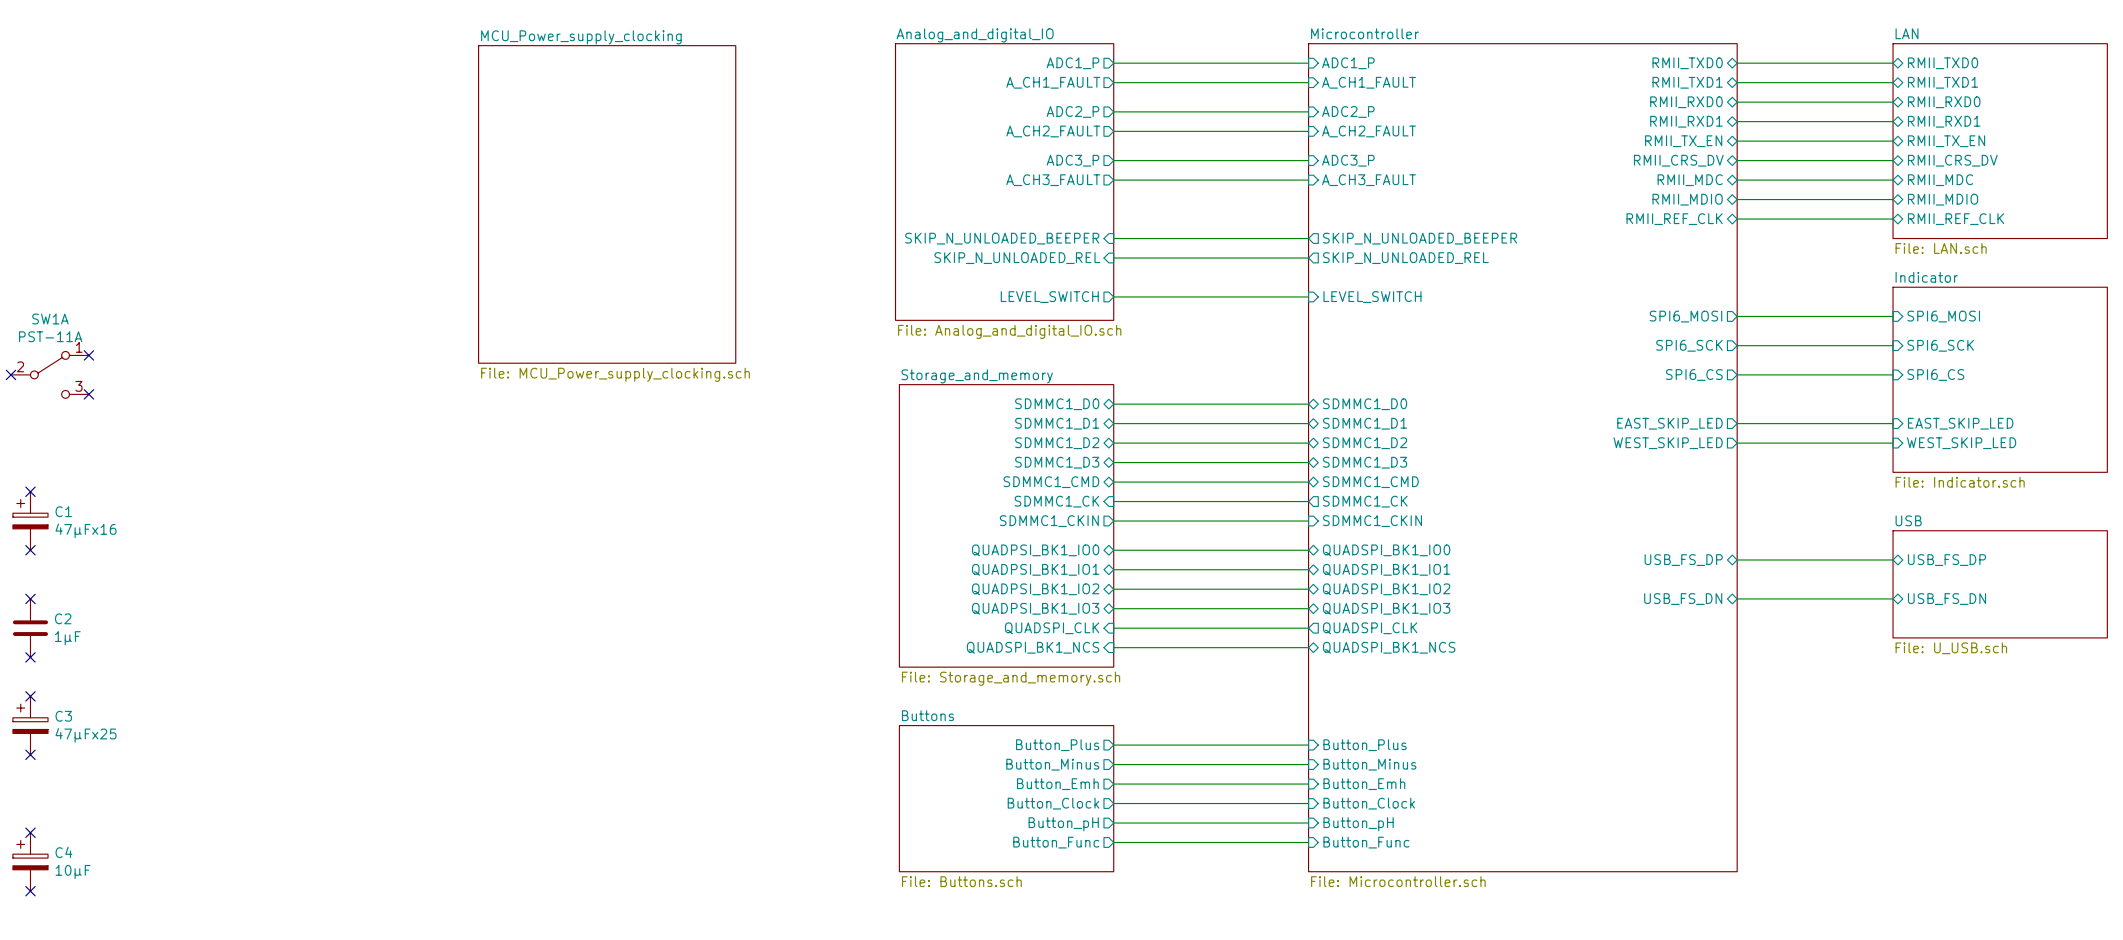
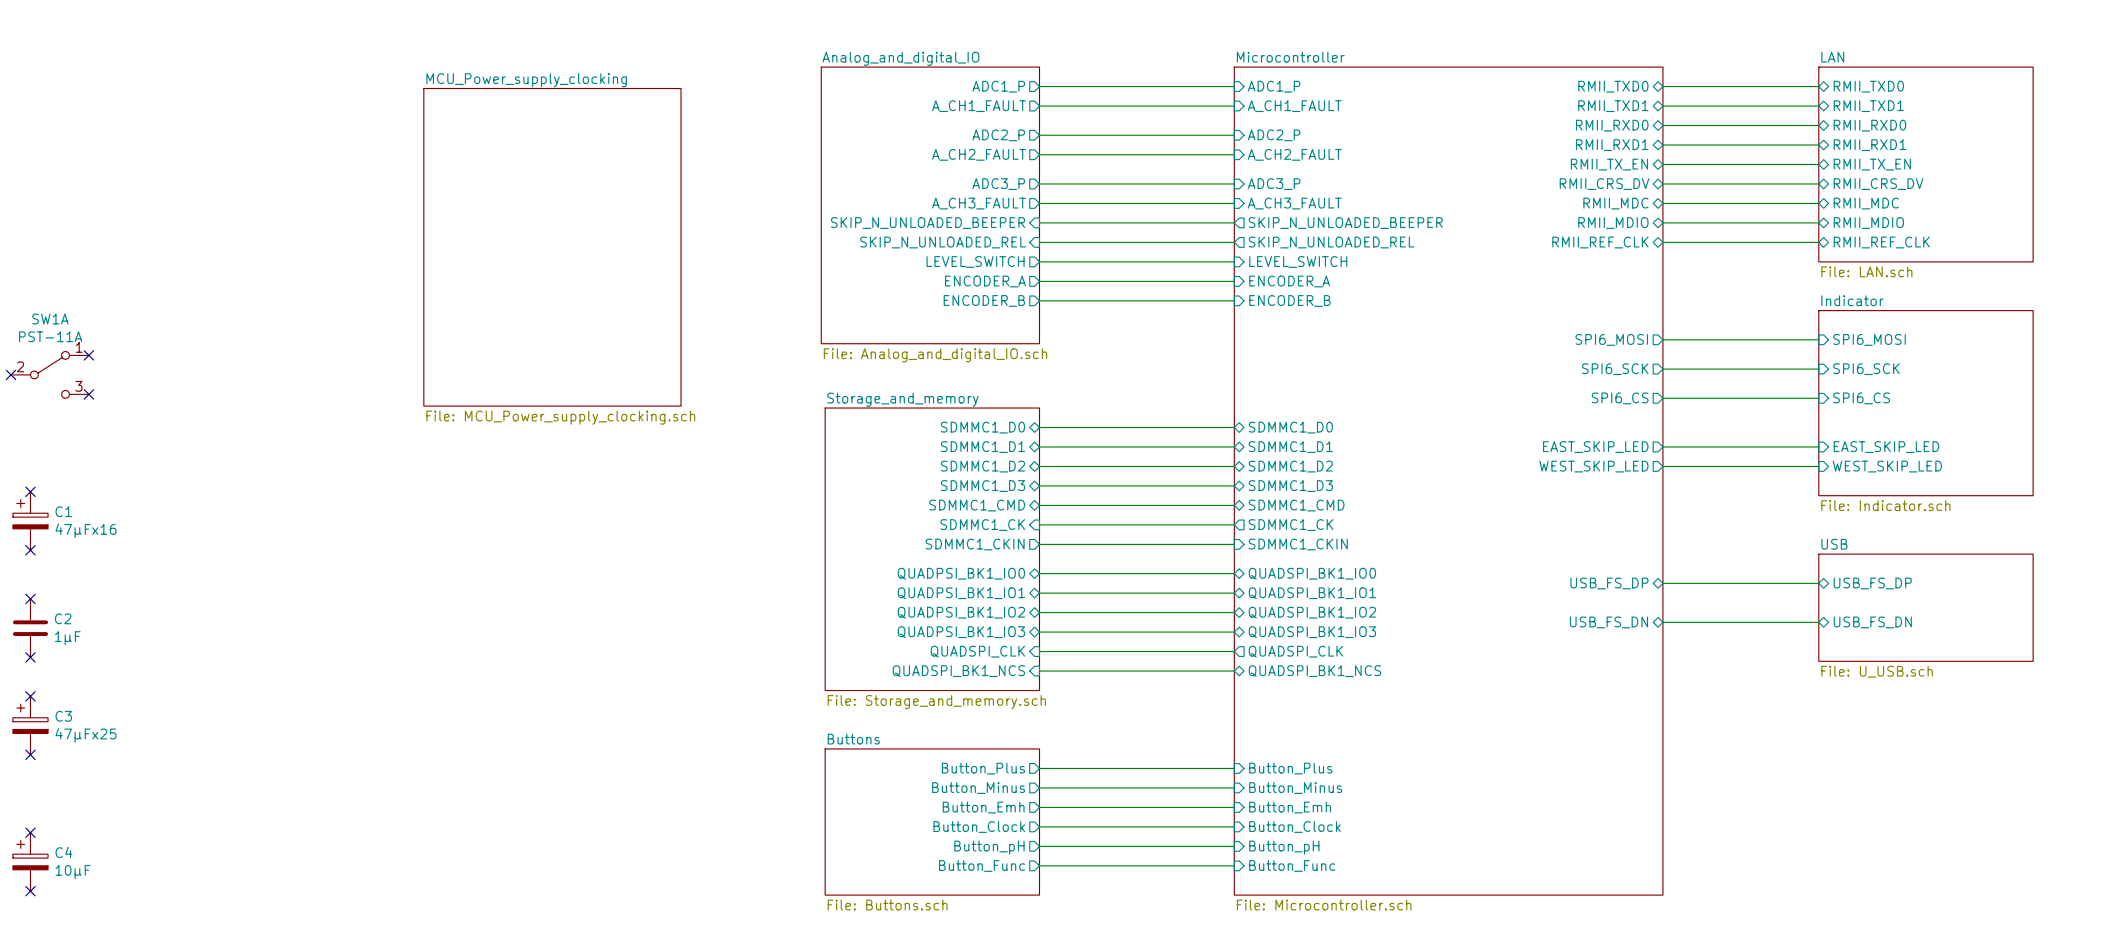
sheet pin: ADC1_P (1072, 63) -> none
wire: (1113, 63) (1308, 63) -> (1039, 86) (1234, 86)
sheet pin: ADC1_P (1348, 63) -> none
sheet pin: RMII_TXD0 (1687, 63) -> none
wire: (1737, 63) (1893, 63) -> (1662, 86) (1818, 86)
sheet pin: RMII_TXD0 (1943, 63) -> none
sheet pin: A_CH1_FAULT (1053, 82) -> none
wire: (1113, 82) (1308, 82) -> (1039, 106) (1234, 106)
sheet pin: A_CH1_FAULT (1369, 82) -> none
sheet pin: RMII_TXD1 (1687, 82) -> none
wire: (1737, 82) (1893, 82) -> (1662, 106) (1818, 106)
sheet pin: RMII_TXD1 (1943, 82) -> none
sheet pin: none -> ADC1_P (998, 86)
sheet pin: none -> ADC1_P (1274, 86)
sheet pin: none -> RMII_TXD0 (1613, 86)
sheet pin: none -> RMII_TXD0 (1868, 86)
sheet pin: RMII_RXD0 (1686, 102) -> none
wire: (1737, 102) (1893, 102) -> (1662, 125) (1818, 125)
sheet pin: RMII_RXD0 (1944, 102) -> none
sheet pin: none -> A_CH1_FAULT (979, 106)
sheet pin: none -> A_CH1_FAULT (1294, 106)
sheet pin: none -> RMII_TXD1 (1613, 106)
sheet pin: none -> RMII_TXD1 (1868, 106)
sheet pin: ADC2_P (1072, 111) -> none
wire: (1113, 111) (1308, 111) -> (1039, 135) (1234, 135)
sheet pin: ADC2_P (1348, 111) -> none
sheet pin: RMII_RXD1 (1686, 121) -> none
wire: (1737, 121) (1893, 121) -> (1662, 145) (1818, 145)
sheet pin: RMII_RXD1 (1944, 121) -> none
sheet pin: none -> RMII_RXD0 (1612, 125)
sheet pin: none -> RMII_RXD0 (1869, 125)
sheet pin: A_CH2_FAULT (1053, 131) -> none
wire: (1113, 131) (1308, 131) -> (1039, 154) (1234, 154)
sheet pin: A_CH2_FAULT (1369, 131) -> none
sheet pin: none -> ADC2_P (998, 135)
sheet pin: none -> ADC2_P (1274, 135)
sheet pin: RMII_TX_EN (1683, 141) -> none
wire: (1737, 141) (1893, 141) -> (1662, 164) (1818, 164)
sheet pin: RMII_TX_EN (1946, 141) -> none
sheet LAN position: (2000, 141) -> (1925, 164)
sheet pin: none -> RMII_RXD1 (1612, 145)
sheet pin: none -> RMII_RXD1 (1869, 145)
sheet pin: none -> A_CH2_FAULT (979, 154)
sheet pin: none -> A_CH2_FAULT (1294, 154)
sheet pin: ADC3_P (1072, 160) -> none
wire: (1113, 160) (1308, 160) -> (1039, 183) (1234, 183)
sheet pin: ADC3_P (1348, 160) -> none
sheet pin: RMII_CRS_DV (1678, 160) -> none
wire: (1737, 160) (1893, 160) -> (1662, 183) (1818, 183)
sheet pin: RMII_CRS_DV (1952, 160) -> none
sheet pin: none -> RMII_TX_EN (1609, 164)
sheet pin: none -> RMII_TX_EN (1872, 164)
sheet pin: A_CH3_FAULT (1053, 180) -> none
wire: (1113, 180) (1308, 180) -> (1039, 203) (1234, 203)
sheet pin: A_CH3_FAULT (1369, 180) -> none
sheet pin: RMII_MDC (1690, 180) -> RMII_CRS_DV (1604, 184)
wire: (1737, 180) (1893, 180) -> (1662, 203) (1818, 203)
sheet pin: RMII_MDC (1940, 180) -> RMII_CRS_DV (1878, 184)
sheet Analog_and_digital_IO position: (1004, 182) -> (930, 205)
sheet pin: none -> ADC3_P (998, 184)
sheet pin: none -> ADC3_P (1274, 184)
sheet pin: RMII_MDIO (1687, 199) -> RMII_MDC (1615, 203)
wire: (1737, 199) (1893, 199) -> (1662, 222) (1818, 222)
sheet pin: RMII_MDIO (1943, 199) -> RMII_MDC (1866, 203)
sheet pin: none -> A_CH3_FAULT (979, 203)
sheet pin: none -> A_CH3_FAULT (1294, 203)
sheet MCU_Power_supply_clocking position: (607, 204) -> (552, 247)
sheet pin: RMII_REF_CLK (1674, 219) -> none
wire: (1737, 219) (1893, 219) -> (1662, 242) (1818, 242)
sheet pin: RMII_REF_CLK (1956, 219) -> none
wire: none -> (1039, 222) (1234, 222)
sheet pin: none -> SKIP_N_UNLOADED_BEEPER (928, 223)
sheet pin: none -> SKIP_N_UNLOADED_BEEPER (1345, 223)
sheet pin: none -> RMII_MDIO (1613, 223)
sheet pin: none -> RMII_MDIO (1868, 223)
sheet pin: SKIP_N_UNLOADED_BEEPER (1002, 238) -> none
wire: (1113, 238) (1308, 238) -> (1039, 261) (1234, 261)
sheet pin: SKIP_N_UNLOADED_BEEPER (1420, 238) -> none
sheet pin: none -> SKIP_N_UNLOADED_REL (943, 242)
wire: none -> (1039, 242) (1234, 242)
sheet pin: none -> SKIP_N_UNLOADED_REL (1331, 242)
sheet pin: none -> RMII_REF_CLK (1600, 242)
sheet pin: none -> RMII_REF_CLK (1881, 242)
sheet pin: SKIP_N_UNLOADED_REL (1017, 258) -> none
wire: (1113, 258) (1308, 258) -> (1039, 281) (1234, 281)
sheet pin: SKIP_N_UNLOADED_REL (1405, 258) -> none
sheet pin: none -> LEVEL_SWITCH (975, 262)
sheet pin: none -> LEVEL_SWITCH (1298, 262)
sheet pin: none -> ENCODER_A (985, 281)
sheet pin: none -> ENCODER_A (1289, 281)
wire: (1113, 296) (1308, 296) -> (1039, 300) (1234, 300)
sheet pin: LEVEL_SWITCH (1049, 297) -> none
sheet pin: LEVEL_SWITCH (1372, 297) -> none
sheet pin: none -> ENCODER_B (984, 300)
sheet pin: none -> ENCODER_B (1289, 300)
sheet pin: SPI6_MOSI (1685, 316) -> none
wire: (1737, 316) (1893, 316) -> (1662, 339) (1818, 339)
sheet pin: SPI6_MOSI (1943, 316) -> none
sheet pin: SPI6_SCK (1689, 345) -> SPI6_MOSI (1611, 339)
wire: (1737, 345) (1893, 345) -> (1662, 369) (1818, 369)
sheet pin: SPI6_SCK (1940, 345) -> SPI6_MOSI (1869, 339)
sheet pin: none -> SPI6_SCK (1615, 369)
wire: (1737, 374) (1893, 374) -> (1662, 398) (1818, 398)
sheet pin: SPI6_CS (1694, 375) -> none
sheet pin: SPI6_CS (1935, 375) -> SPI6_SCK (1866, 369)
sheet Indicator position: (2000, 379) -> (1925, 403)
sheet pin: none -> SPI6_CS (1620, 398)
sheet pin: none -> SPI6_CS (1861, 398)
sheet pin: SDMMC1_D0 (1057, 404) -> none
wire: (1113, 404) (1308, 404) -> (1039, 427) (1234, 427)
sheet pin: SDMMC1_D0 (1365, 404) -> none
sheet pin: SDMMC1_D1 (1057, 423) -> none
wire: (1113, 423) (1308, 423) -> (1039, 446) (1234, 446)
sheet pin: SDMMC1_D1 (1365, 423) -> none
sheet pin: EAST_SKIP_LED (1669, 423) -> none
wire: (1737, 423) (1893, 423) -> (1662, 446) (1818, 446)
sheet pin: EAST_SKIP_LED (1960, 423) -> none
sheet pin: none -> SDMMC1_D0 (982, 427)
sheet pin: none -> SDMMC1_D0 (1290, 427)
sheet pin: SDMMC1_D2 (1057, 443) -> none
wire: (1113, 443) (1308, 443) -> (1039, 466) (1234, 466)
sheet pin: SDMMC1_D2 (1365, 443) -> none
sheet pin: WEST_SKIP_LED (1668, 443) -> EAST_SKIP_LED (1595, 447)
wire: (1737, 443) (1893, 443) -> (1662, 466) (1818, 466)
sheet pin: WEST_SKIP_LED (1961, 443) -> EAST_SKIP_LED (1886, 447)
sheet pin: none -> SDMMC1_D1 (982, 447)
sheet pin: none -> SDMMC1_D1 (1290, 447)
sheet Microcontroller position: (1522, 457) -> (1448, 481)
sheet pin: SDMMC1_D3 (1057, 462) -> none
wire: (1113, 462) (1308, 462) -> (1039, 485) (1234, 485)
sheet pin: SDMMC1_D3 (1365, 462) -> none
sheet pin: none -> SDMMC1_D2 (982, 466)
sheet pin: none -> SDMMC1_D2 (1290, 466)
sheet pin: none -> WEST_SKIP_LED (1593, 466)
sheet pin: none -> WEST_SKIP_LED (1887, 466)
sheet pin: SDMMC1_CMD (1051, 482) -> none
wire: (1113, 482) (1308, 482) -> (1039, 505) (1234, 505)
sheet pin: SDMMC1_CMD (1370, 482) -> none
sheet pin: none -> SDMMC1_D3 (982, 486)
sheet pin: none -> SDMMC1_D3 (1290, 486)
sheet pin: SDMMC1_CK (1056, 501) -> none
wire: (1113, 501) (1308, 501) -> (1039, 524) (1234, 524)
sheet pin: SDMMC1_CK (1365, 501) -> none
sheet pin: none -> SDMMC1_CMD (977, 505)
sheet pin: none -> SDMMC1_CMD (1296, 505)
sheet pin: SDMMC1_CKIN (1049, 521) -> none
wire: (1113, 521) (1308, 521) -> (1039, 544) (1234, 544)
sheet pin: SDMMC1_CKIN (1372, 521) -> none
sheet pin: none -> SDMMC1_CK (982, 525)
sheet Storage_and_memory position: (1006, 525) -> (932, 549)
sheet pin: none -> SDMMC1_CK (1291, 525)
sheet pin: none -> SDMMC1_CKIN (975, 544)
sheet pin: none -> SDMMC1_CKIN (1298, 544)
sheet pin position: QUADPSI_BK1_IO0 (1035, 550) -> QUADPSI_BK1_IO0 (961, 573)
wire: (1113, 550) (1308, 550) -> (1039, 573) (1234, 573)
sheet pin position: QUADSPI_BK1_IO0 (1386, 550) -> QUADSPI_BK1_IO0 (1312, 573)
wire: (1737, 559) (1893, 559) -> (1662, 583) (1818, 583)
sheet pin: USB_FS_DP (1683, 560) -> none
sheet pin: USB_FS_DP (1946, 560) -> none
sheet pin position: QUADPSI_BK1_IO1 (1035, 569) -> QUADPSI_BK1_IO1 (961, 593)
wire: (1113, 569) (1308, 569) -> (1039, 593) (1234, 593)
sheet pin position: QUADSPI_BK1_IO1 (1386, 569) -> QUADSPI_BK1_IO1 (1312, 593)
sheet USB position: (2000, 584) -> (1925, 607)
sheet pin position: QUADPSI_BK1_IO2 (1035, 589) -> QUADPSI_BK1_IO2 (961, 612)
wire: (1113, 589) (1308, 589) -> (1039, 612) (1234, 612)
sheet pin position: QUADSPI_BK1_IO2 (1386, 589) -> QUADSPI_BK1_IO2 (1312, 612)
wire: (1737, 598) (1893, 598) -> (1662, 622) (1818, 622)
sheet pin: USB_FS_DN (1683, 599) -> USB_FS_DP (1609, 583)
sheet pin: USB_FS_DN (1946, 599) -> USB_FS_DP (1872, 583)
sheet pin position: QUADPSI_BK1_IO3 (1035, 608) -> QUADPSI_BK1_IO3 (961, 632)
wire: (1113, 608) (1308, 608) -> (1039, 632) (1234, 632)
sheet pin position: QUADSPI_BK1_IO3 (1386, 608) -> QUADSPI_BK1_IO3 (1312, 632)
sheet pin: none -> USB_FS_DN (1608, 622)
sheet pin: none -> USB_FS_DN (1872, 622)
sheet pin: QUADSPI_CLK (1052, 628) -> none
wire: (1113, 628) (1308, 628) -> (1039, 651) (1234, 651)
sheet pin: QUADSPI_CLK (1370, 628) -> none
sheet pin: QUADSPI_BK1_NCS (1033, 647) -> QUADSPI_CLK (977, 651)
wire: (1113, 647) (1308, 647) -> (1039, 671) (1234, 671)
sheet pin shape: bidirectional (1389, 647) -> output (1295, 651)
sheet pin: QUADSPI_BK1_NCS (1389, 647) -> QUADSPI_CLK (1295, 651)
sheet pin: none -> QUADSPI_BK1_NCS (958, 671)
sheet pin: none -> QUADSPI_BK1_NCS (1314, 671)
sheet pin: Button_Plus (1057, 745) -> none
wire: (1113, 745) (1308, 745) -> (1039, 768) (1234, 768)
sheet pin: Button_Plus (1365, 745) -> none
sheet pin: Button_Minus (1052, 764) -> none
wire: (1113, 764) (1308, 764) -> (1039, 787) (1234, 787)
sheet pin: Button_Minus (1369, 764) -> none
sheet pin: none -> Button_Plus (983, 768)
sheet pin: none -> Button_Plus (1290, 768)
sheet pin: Button_Emh (1057, 784) -> none
wire: (1113, 784) (1308, 784) -> (1039, 807) (1234, 807)
sheet pin: Button_Emh (1364, 784) -> none
sheet pin: none -> Button_Minus (978, 788)
sheet pin: none -> Button_Minus (1295, 788)
sheet Buttons position: (1006, 798) -> (932, 822)
sheet pin: Button_Clock (1053, 803) -> none
wire: (1113, 803) (1308, 803) -> (1039, 826) (1234, 826)
sheet pin: Button_Clock (1369, 803) -> none
sheet pin: none -> Button_Emh (983, 807)
sheet pin: none -> Button_Emh (1290, 807)
wire: (1113, 823) (1308, 823) -> (1039, 846) (1234, 846)
sheet pin: Button_pH (1063, 824) -> none
sheet pin: Button_pH (1358, 824) -> none
sheet pin: none -> Button_Clock (979, 827)
sheet pin: none -> Button_Clock (1295, 827)
sheet pin: Button_Func (1056, 842) -> none
wire: (1113, 842) (1308, 842) -> (1039, 865) (1234, 865)
sheet pin: Button_Func (1366, 842) -> none
sheet pin: none -> Button_pH (989, 847)
sheet pin: none -> Button_pH (1284, 847)
sheet pin: none -> Button_Func (982, 865)
sheet pin: none -> Button_Func (1292, 865)

